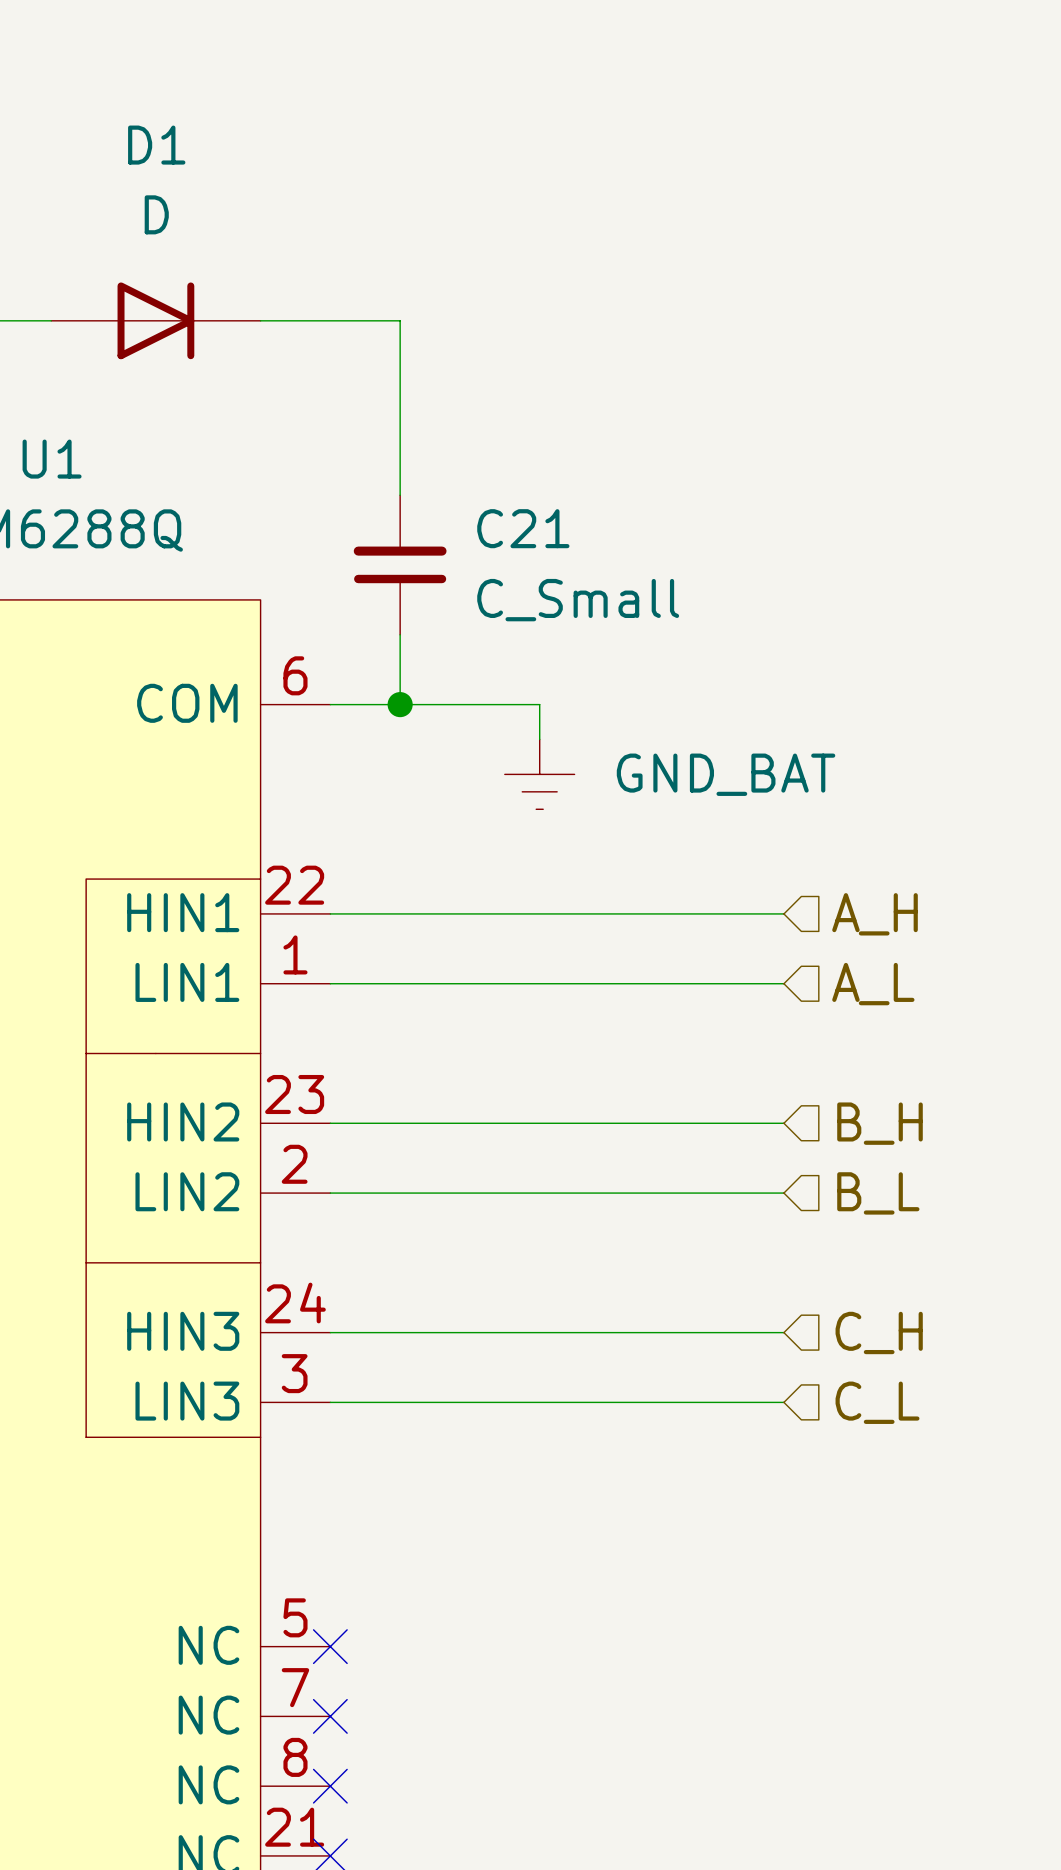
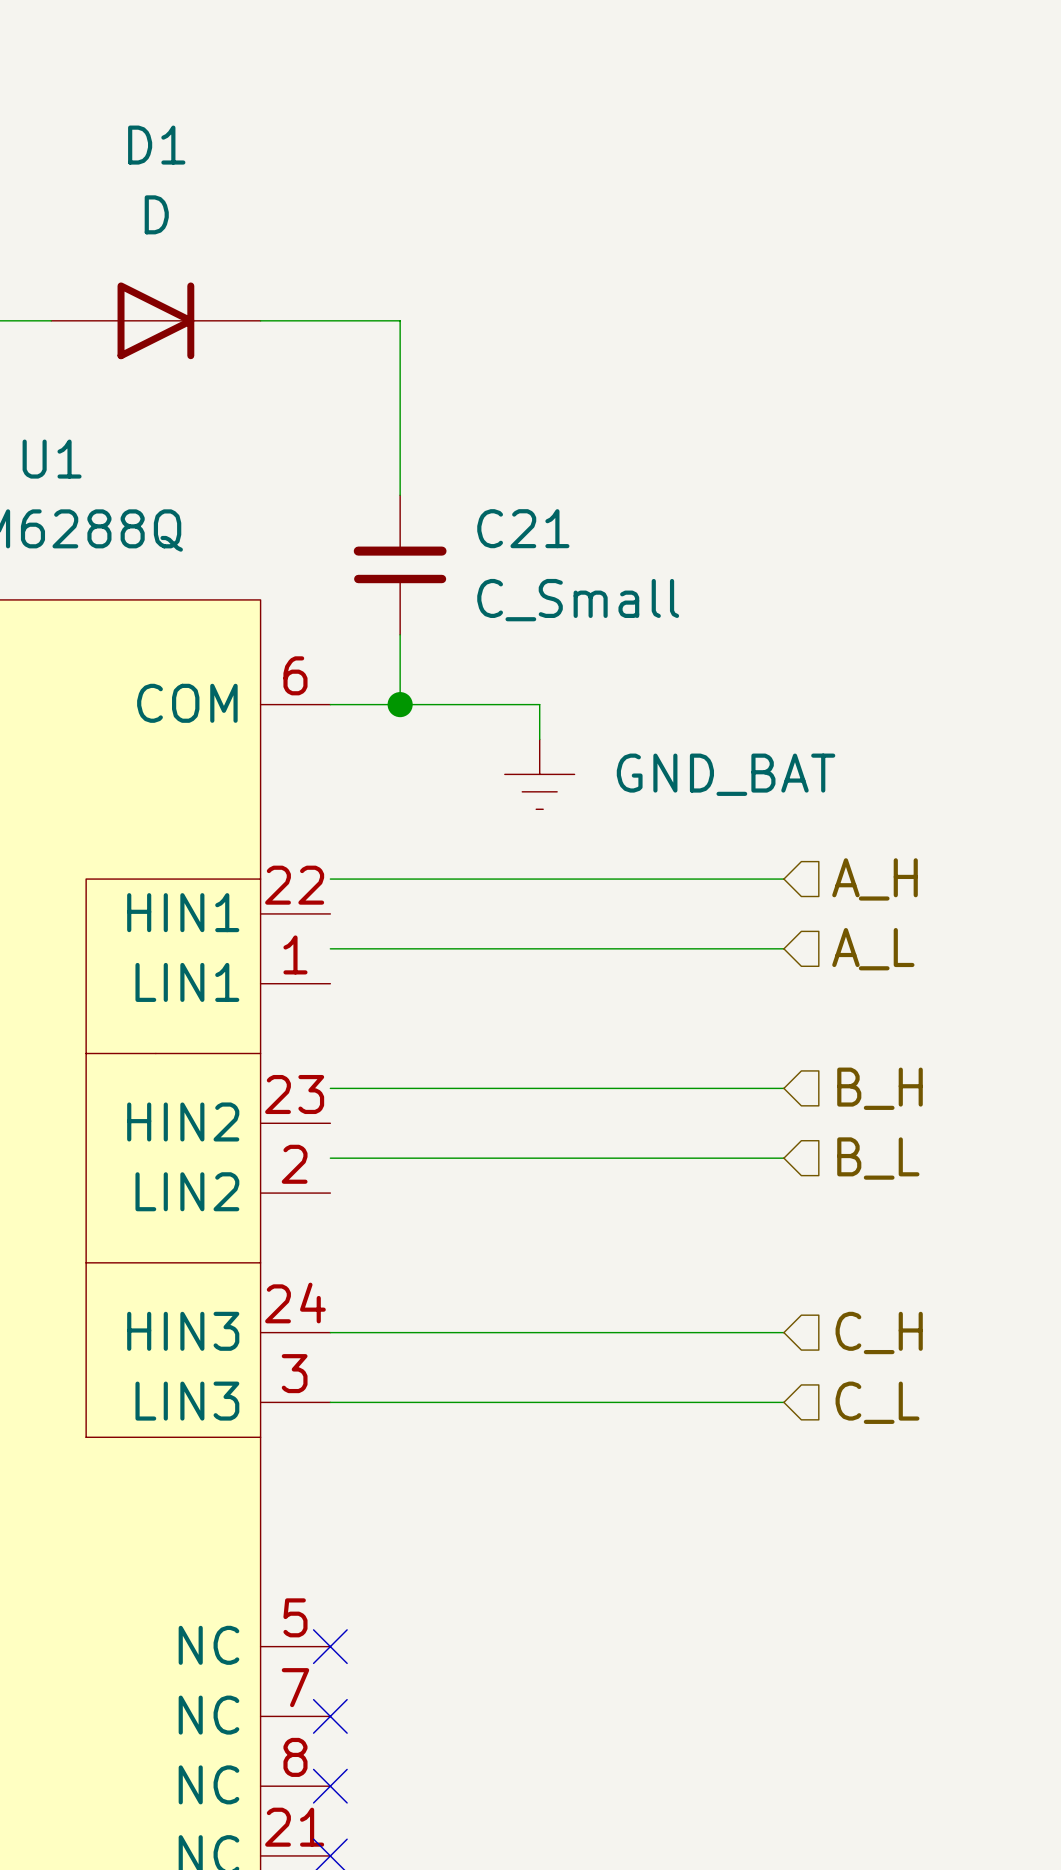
wire: (330, 913) (783, 913) -> (330, 948) (783, 948)
hierarchical label position: A_H (875, 914) -> A_H (875, 879)
wire: (330, 983) (783, 983) -> (330, 879) (783, 879)
hierarchical label position: A_L (873, 984) -> A_L (873, 949)
wire: (330, 1123) (783, 1123) -> (330, 1158) (783, 1158)
hierarchical label position: B_H (880, 1123) -> B_H (880, 1088)
wire: (330, 1193) (783, 1193) -> (330, 1088) (783, 1088)
hierarchical label position: B_L (878, 1193) -> B_L (878, 1158)

